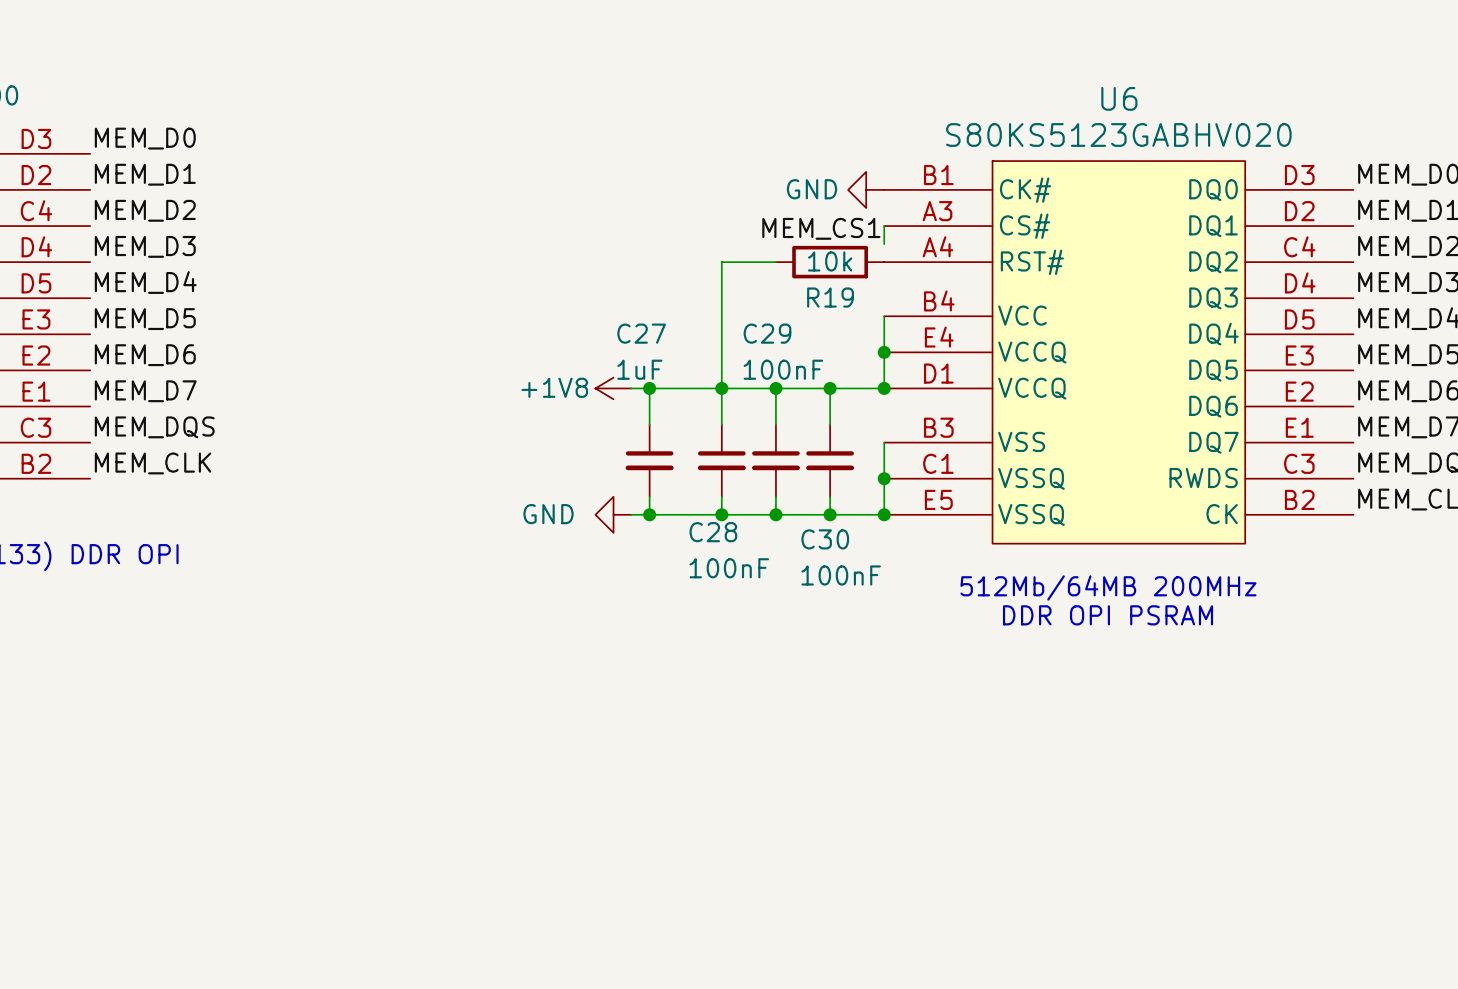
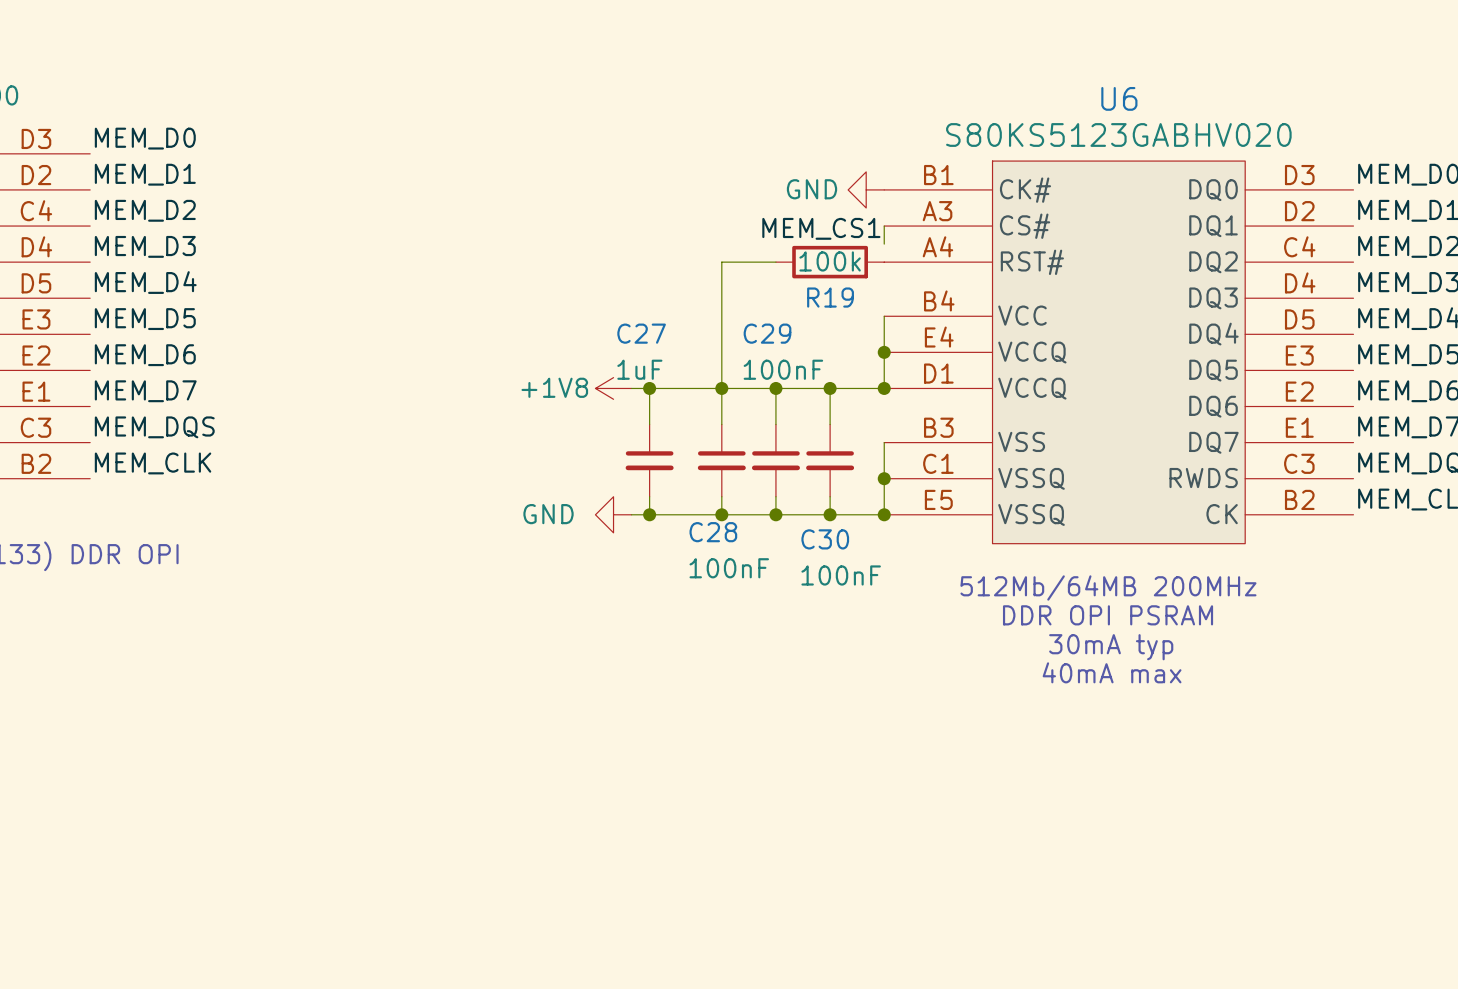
R19 value: 10k (830, 261) -> 100k (830, 261)
text: none -> 30mA typ (1111, 647)
text: none -> 40mA max (1112, 672)

